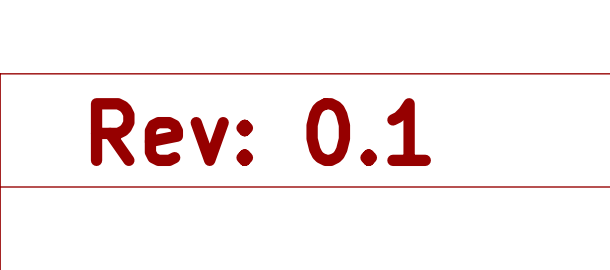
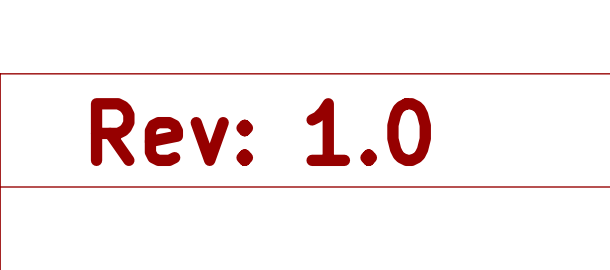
title block: Rev: 0.1 (260, 132) -> Rev: 1.0 (260, 132)

